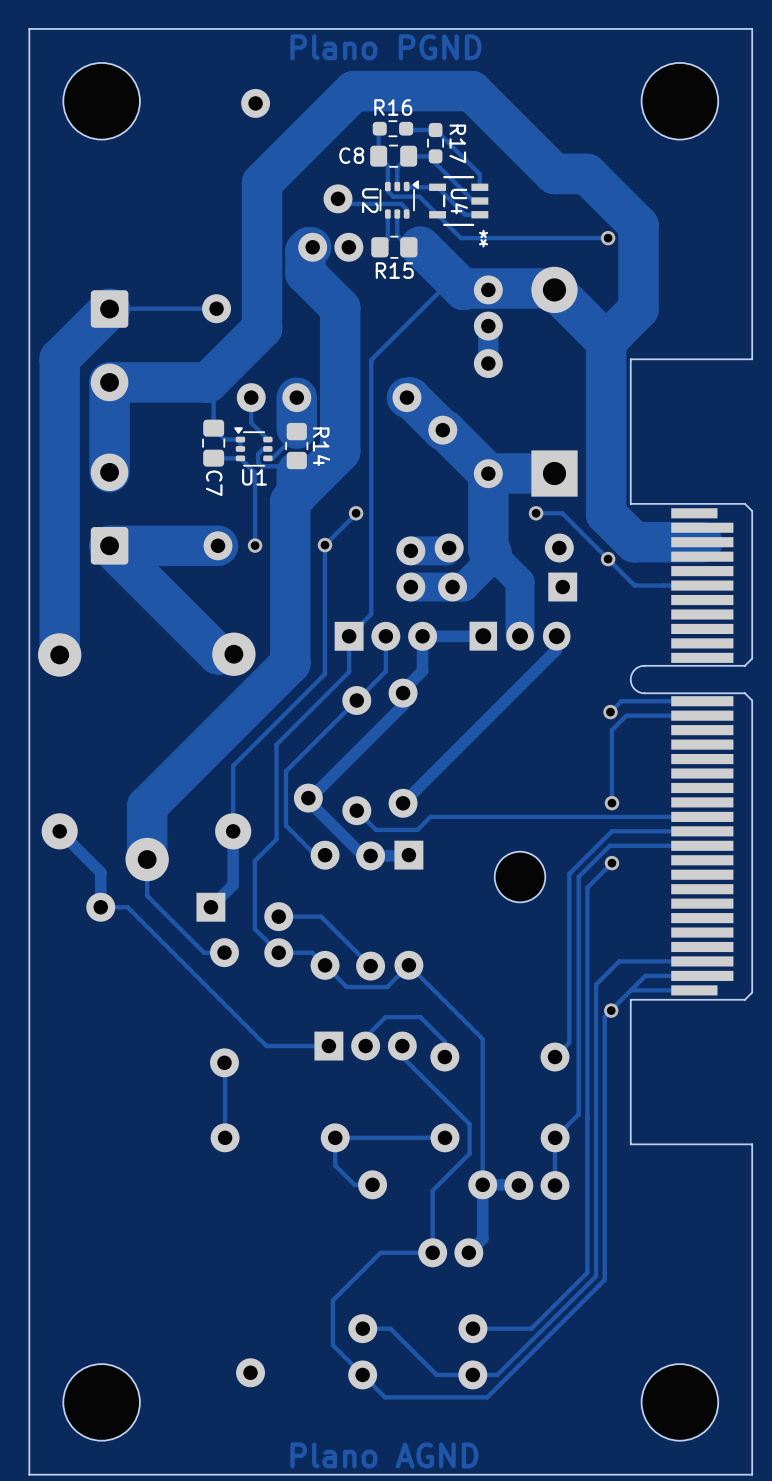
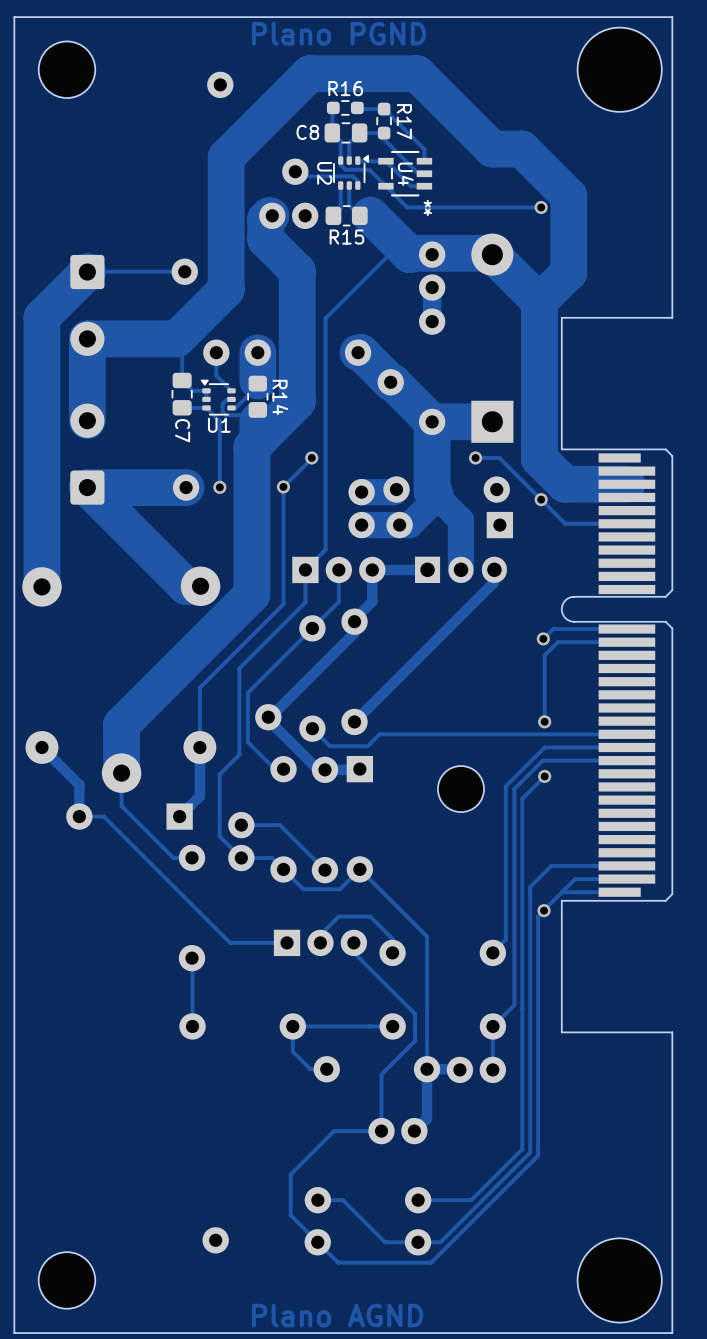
part: none -> (66, 69)
part: none -> (619, 69)
part: (101, 101) -> none
part: (679, 101) -> none
part: (101, 1402) -> none
part: (679, 1402) -> none
part: none -> (66, 1280)
part: none -> (619, 1280)

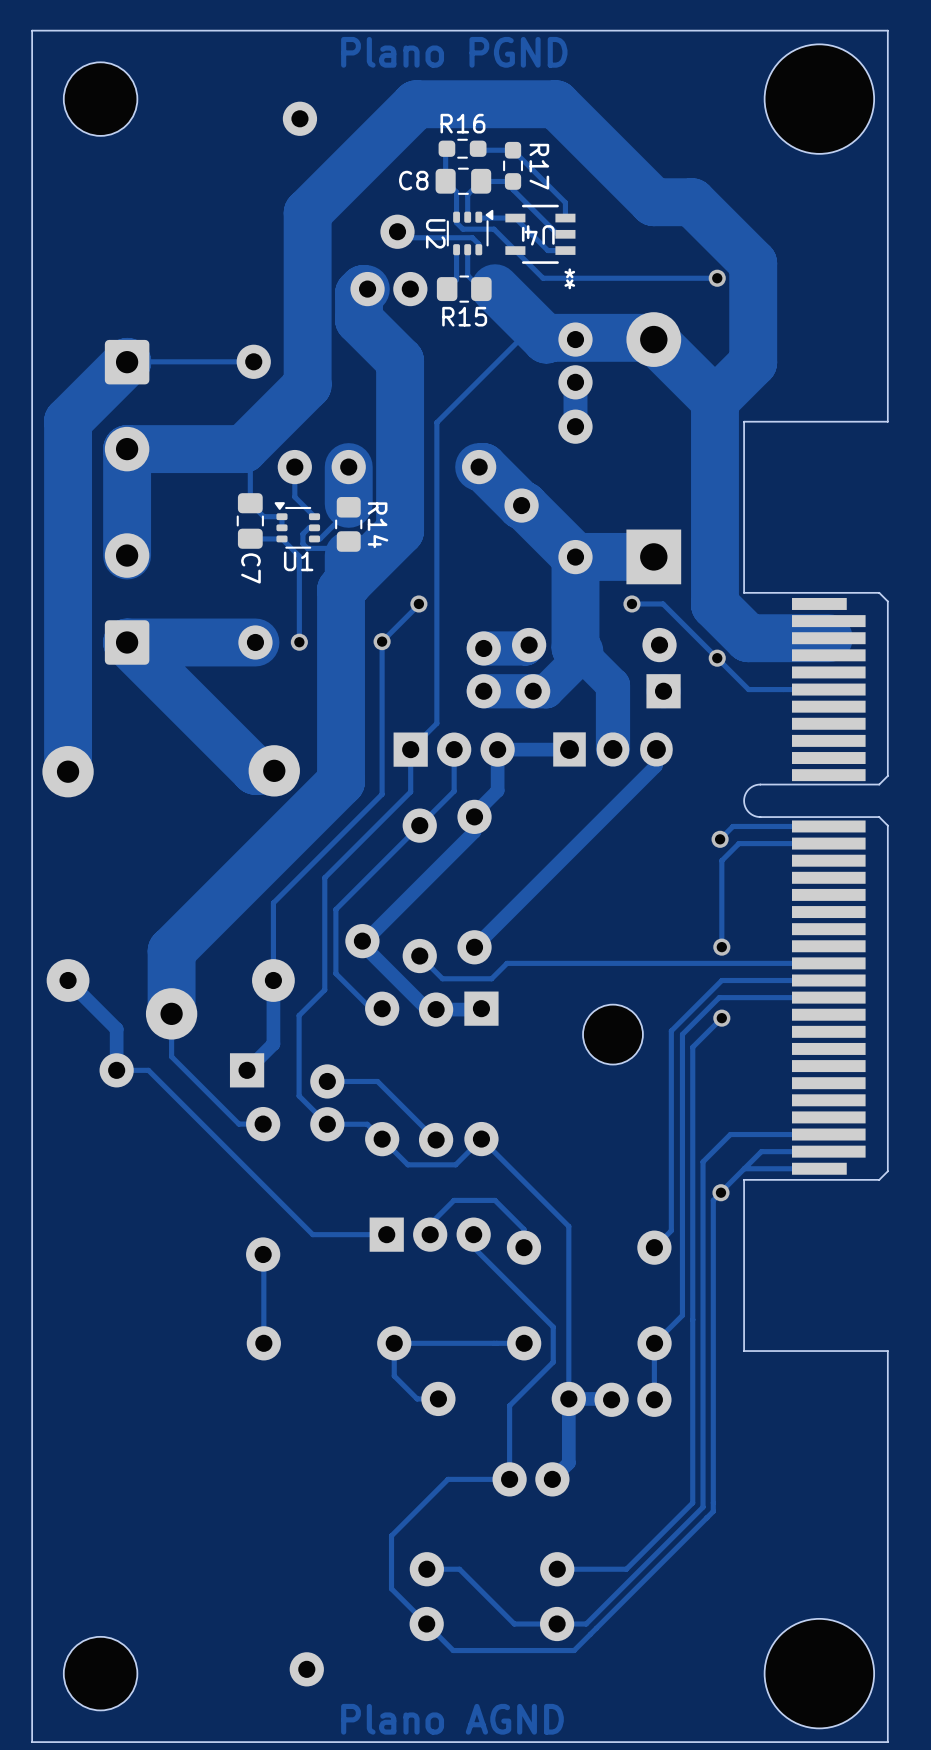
U4 name rotation: 0° (405, 174) -> 90° clockwise (539, 235)
part position: (215, 1240) -> (306, 1669)

